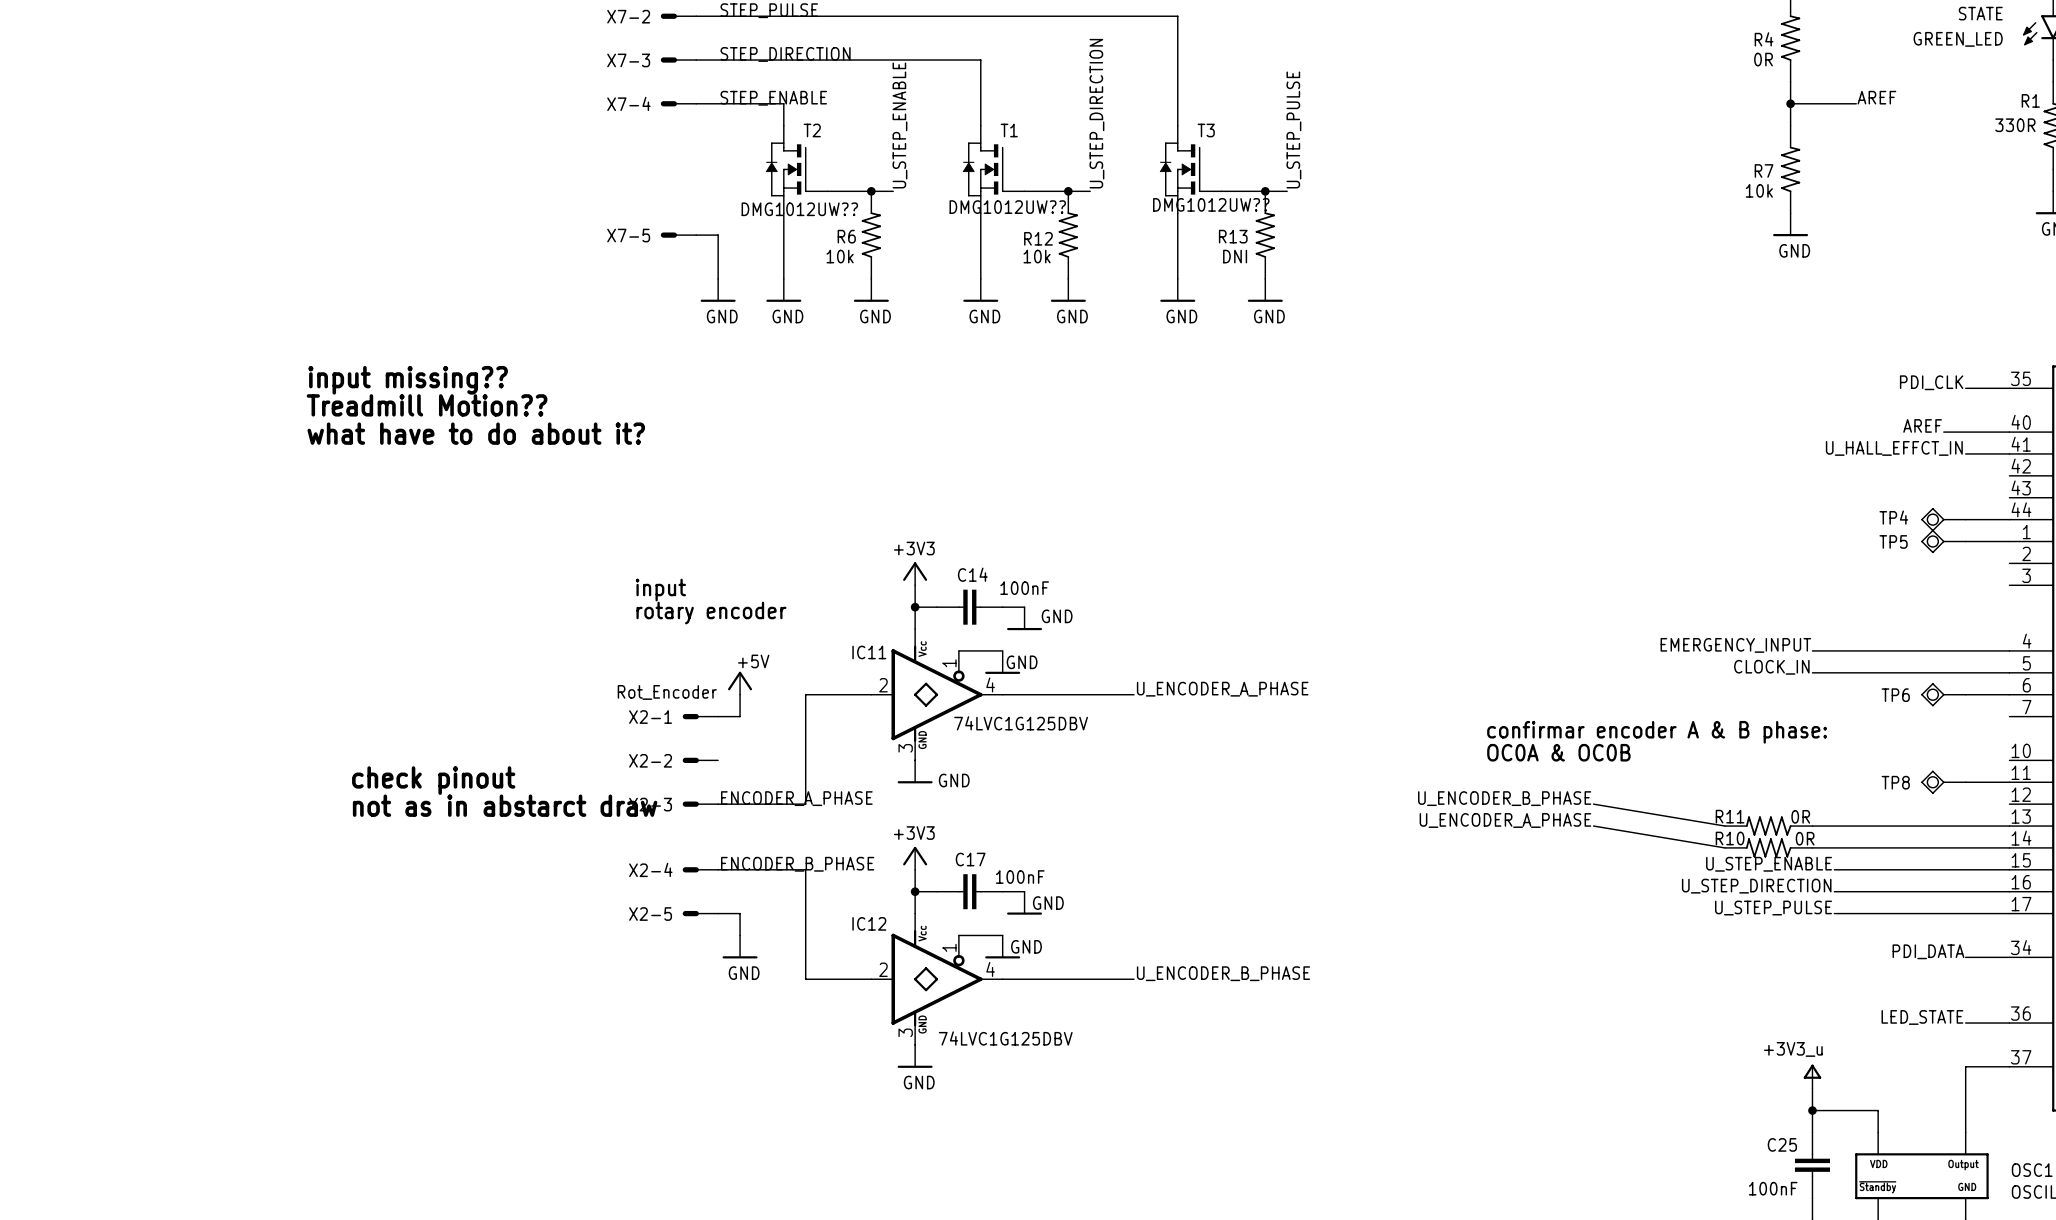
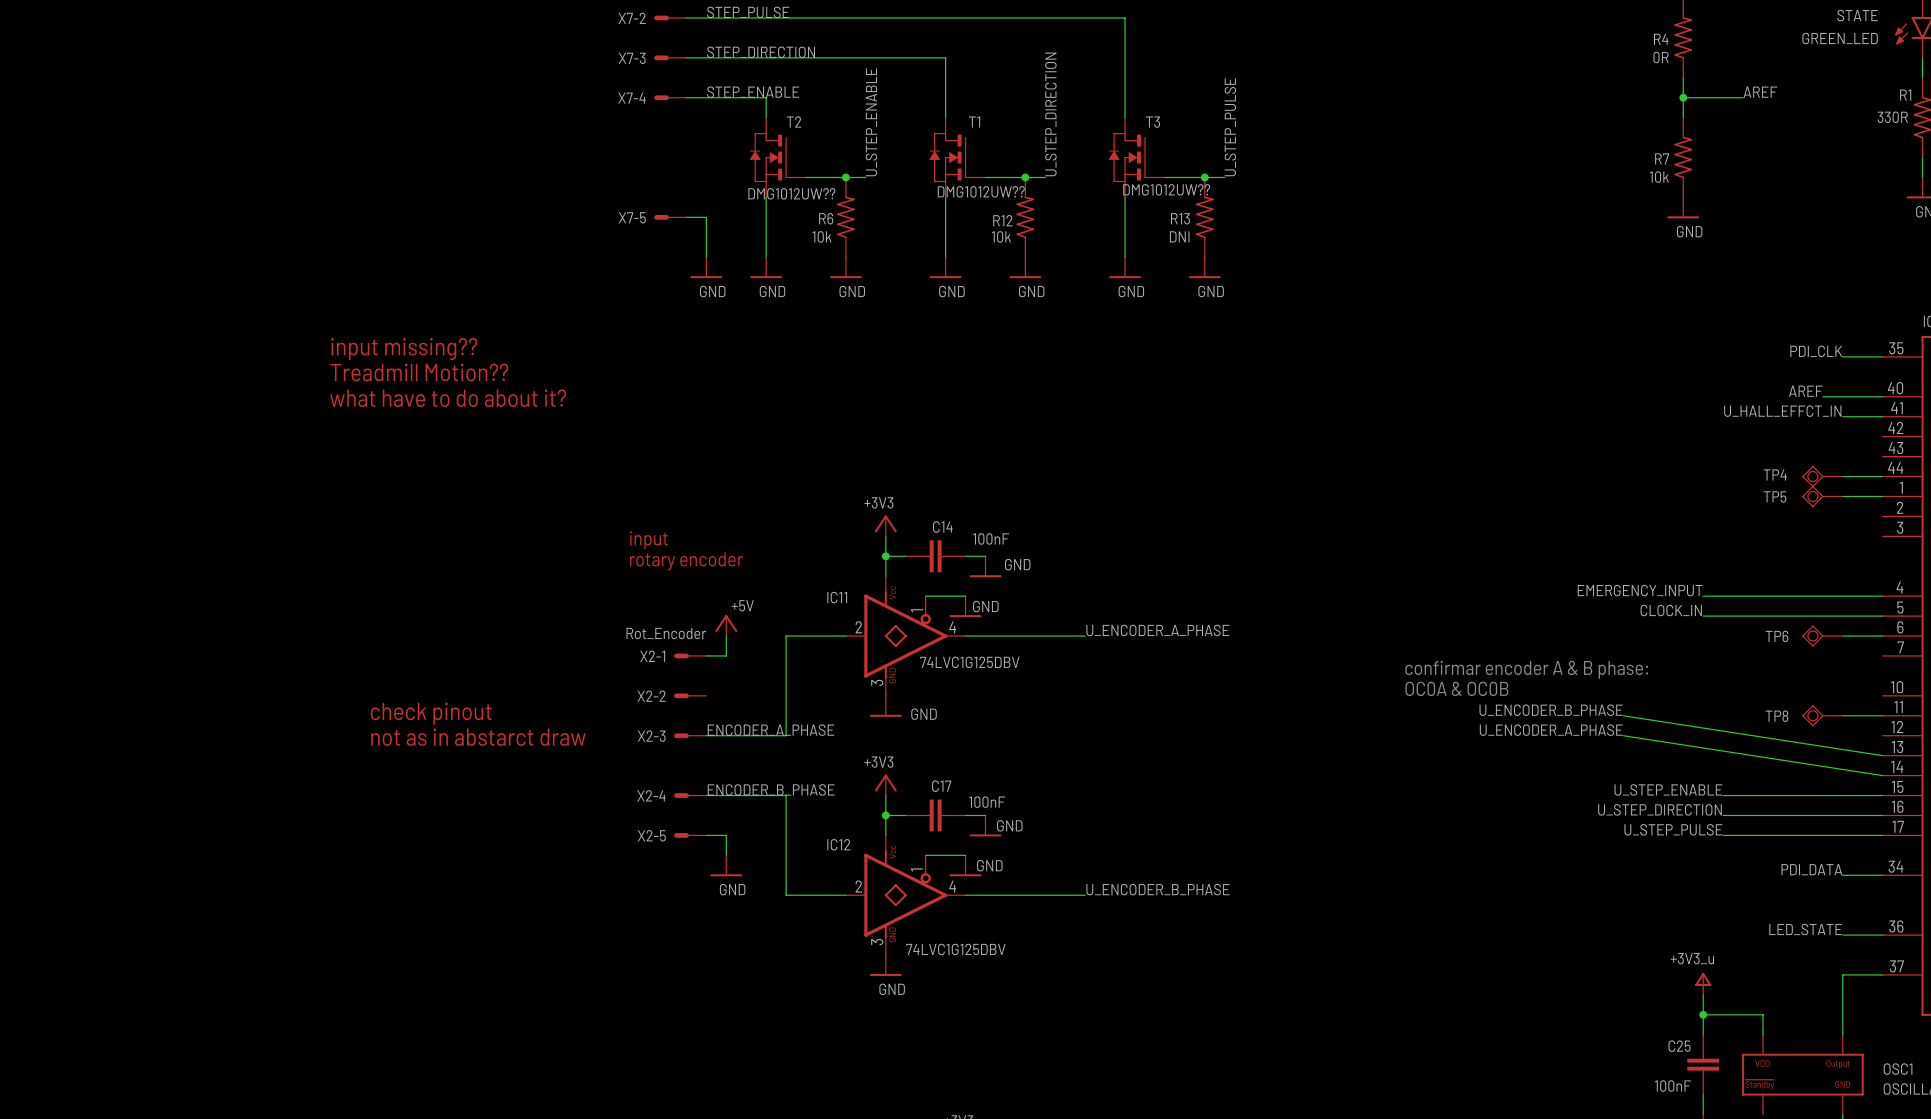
label position: U_ENCODER_B_PHASE (1504, 798) -> U_ENCODER_B_PHASE (1551, 710)
wire: (1593, 804) (1724, 826) -> none
label position: U_ENCODER_A_PHASE (1505, 820) -> U_ENCODER_A_PHASE (1551, 730)
wire: (1593, 826) (1724, 847) -> none
R11: 0R (1768, 826) -> none
wire: (1812, 826) (2009, 826) -> (1623, 715) (1882, 755)
R10: 0R (1768, 847) -> none
wire: (1812, 847) (2009, 847) -> (1623, 735) (1882, 775)

